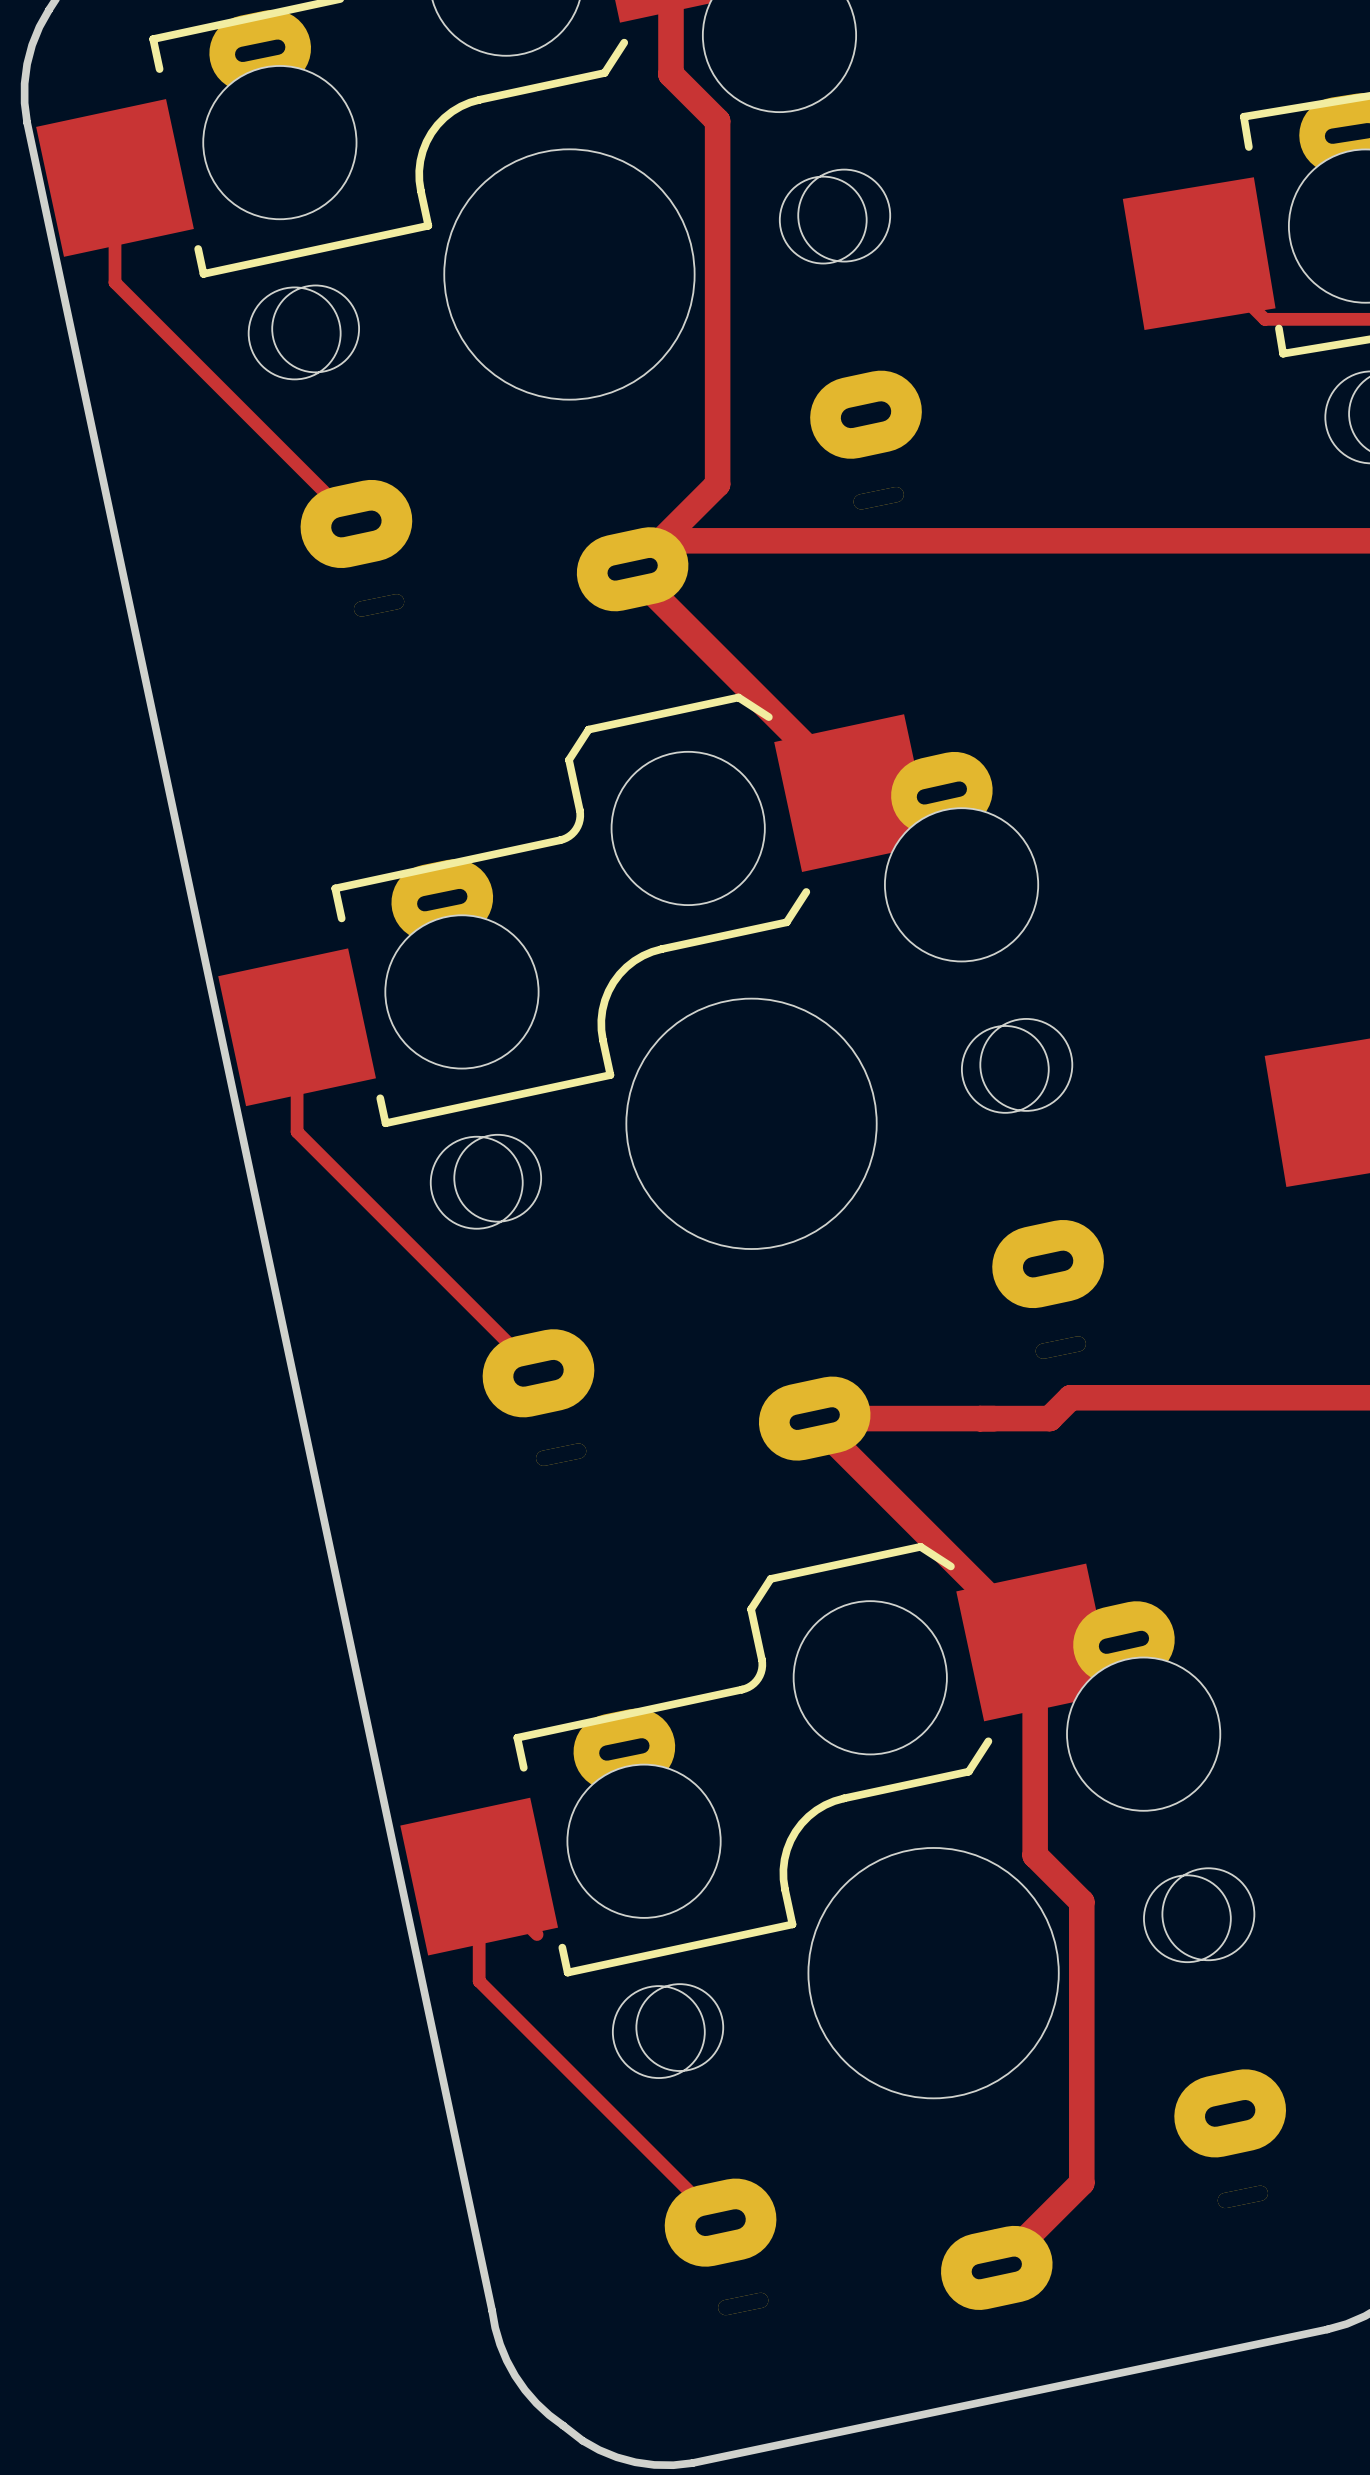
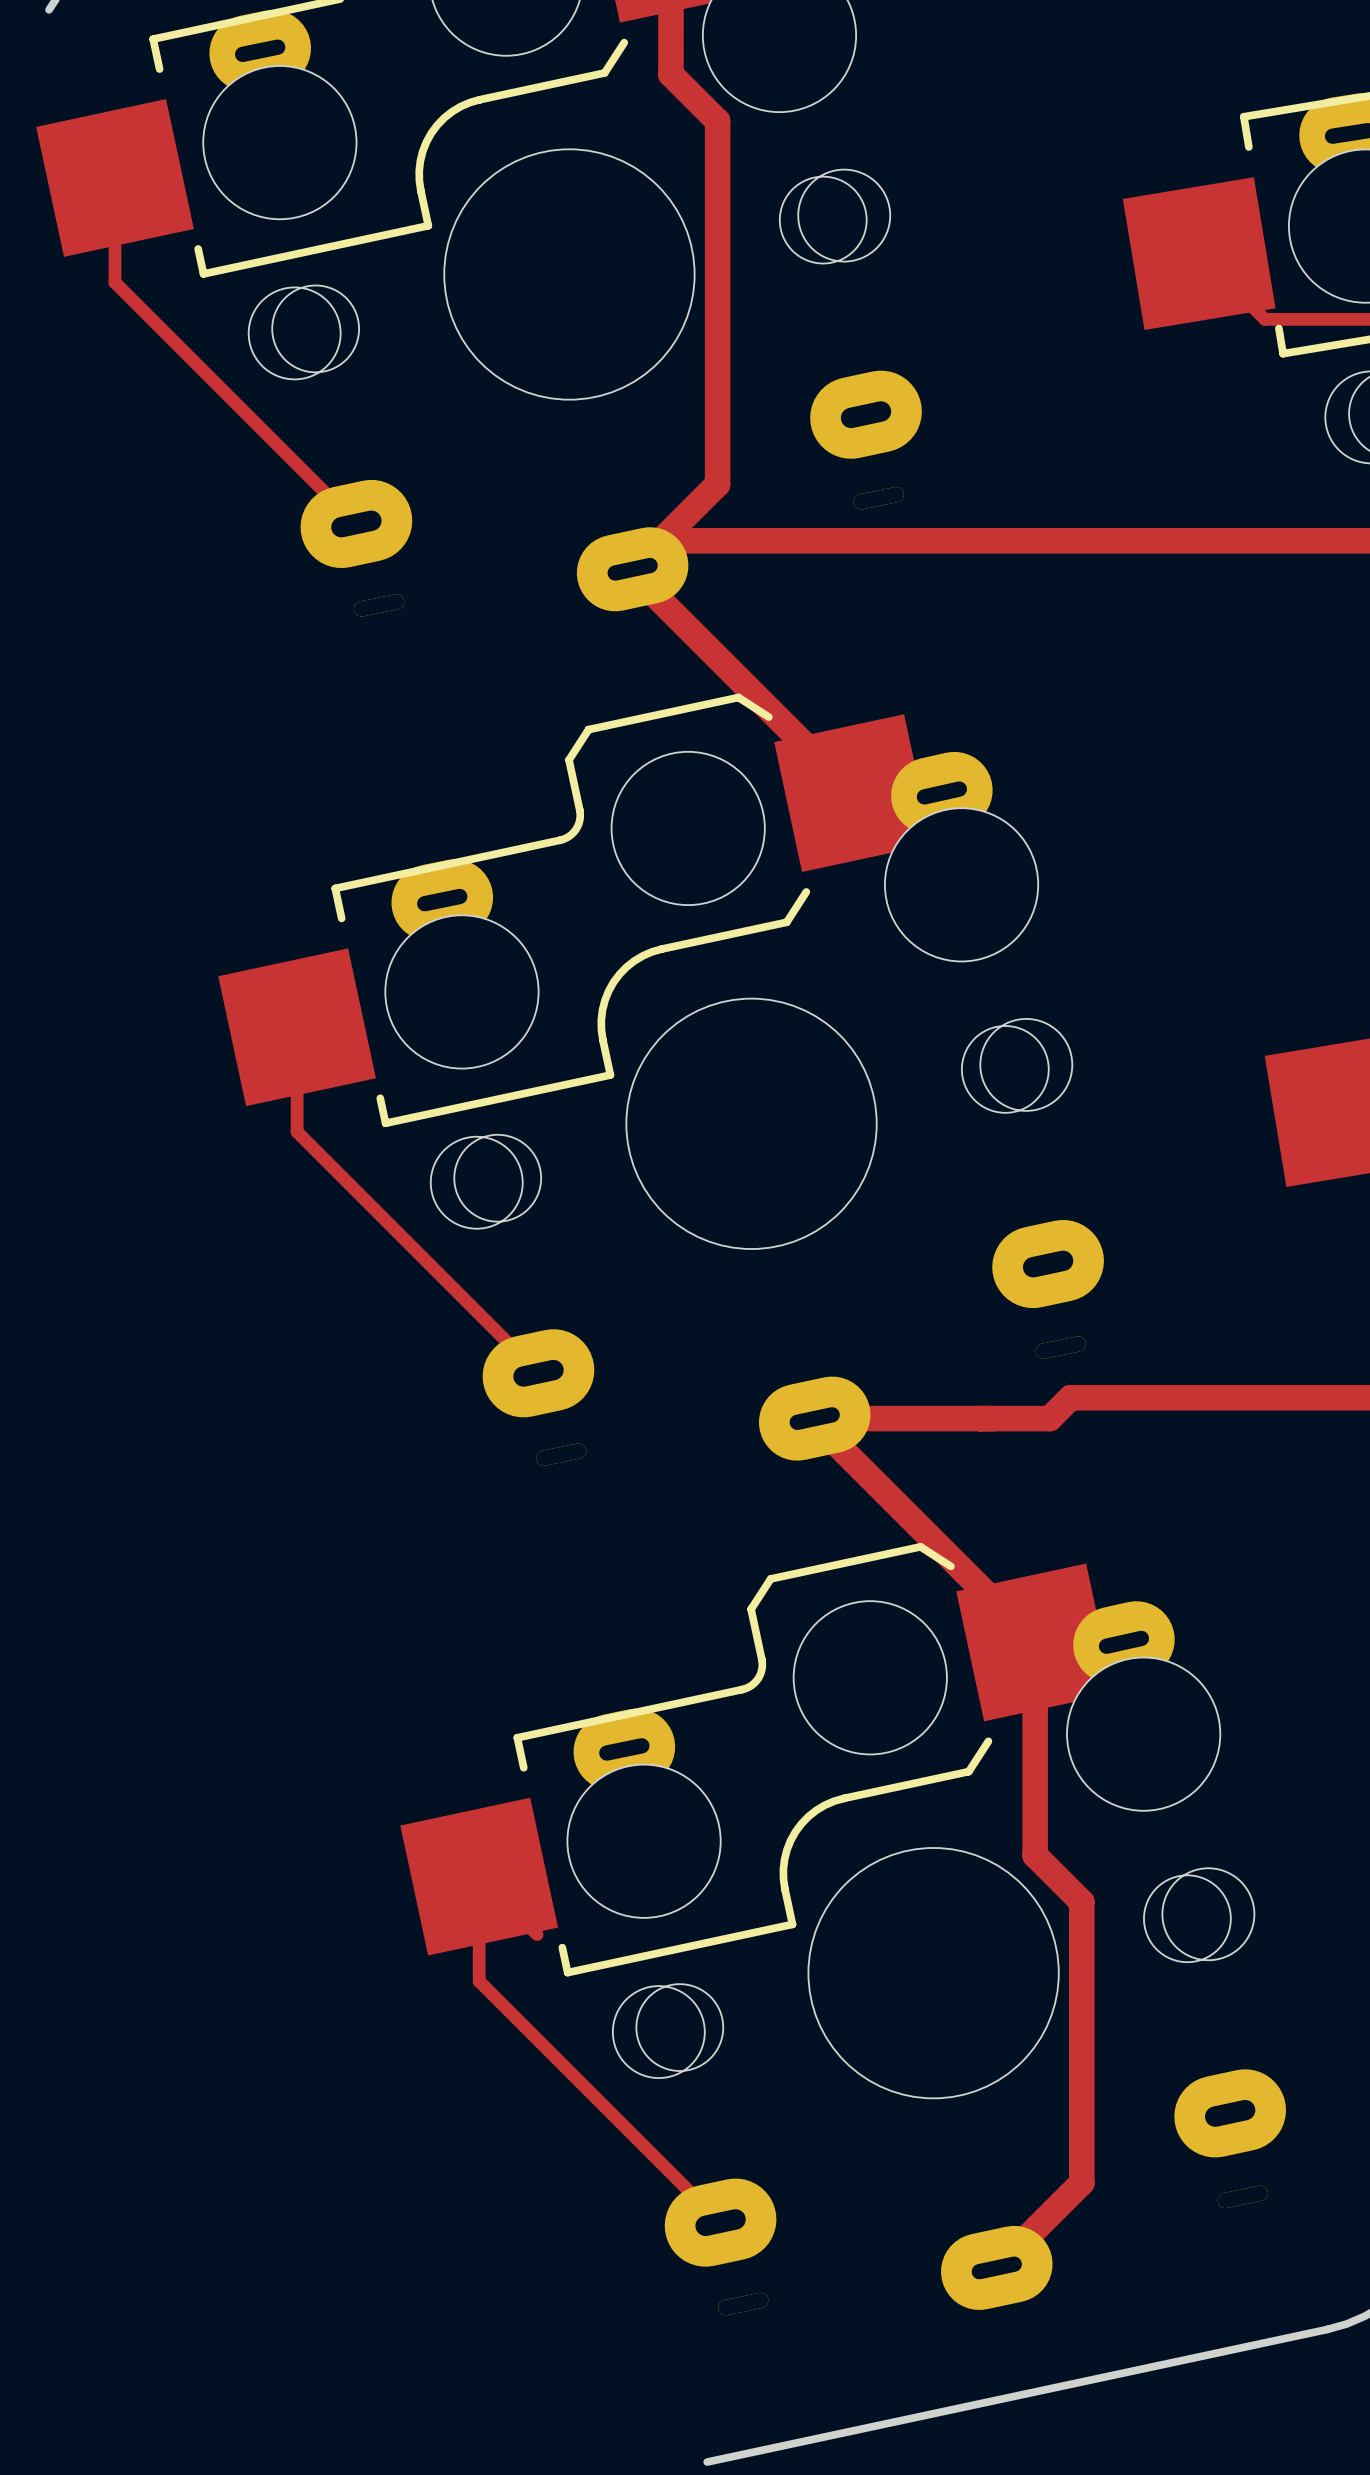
board edge: (49, 9) (39, 26) (27, 64) (24, 103) (27, 122) (495, 2327) (500, 2344) (515, 2375) (536, 2403) (582, 2440) (616, 2457) (654, 2464) (673, 2465) (692, 2463) (1327, 2329) -> (707, 2462) (1327, 2329)

